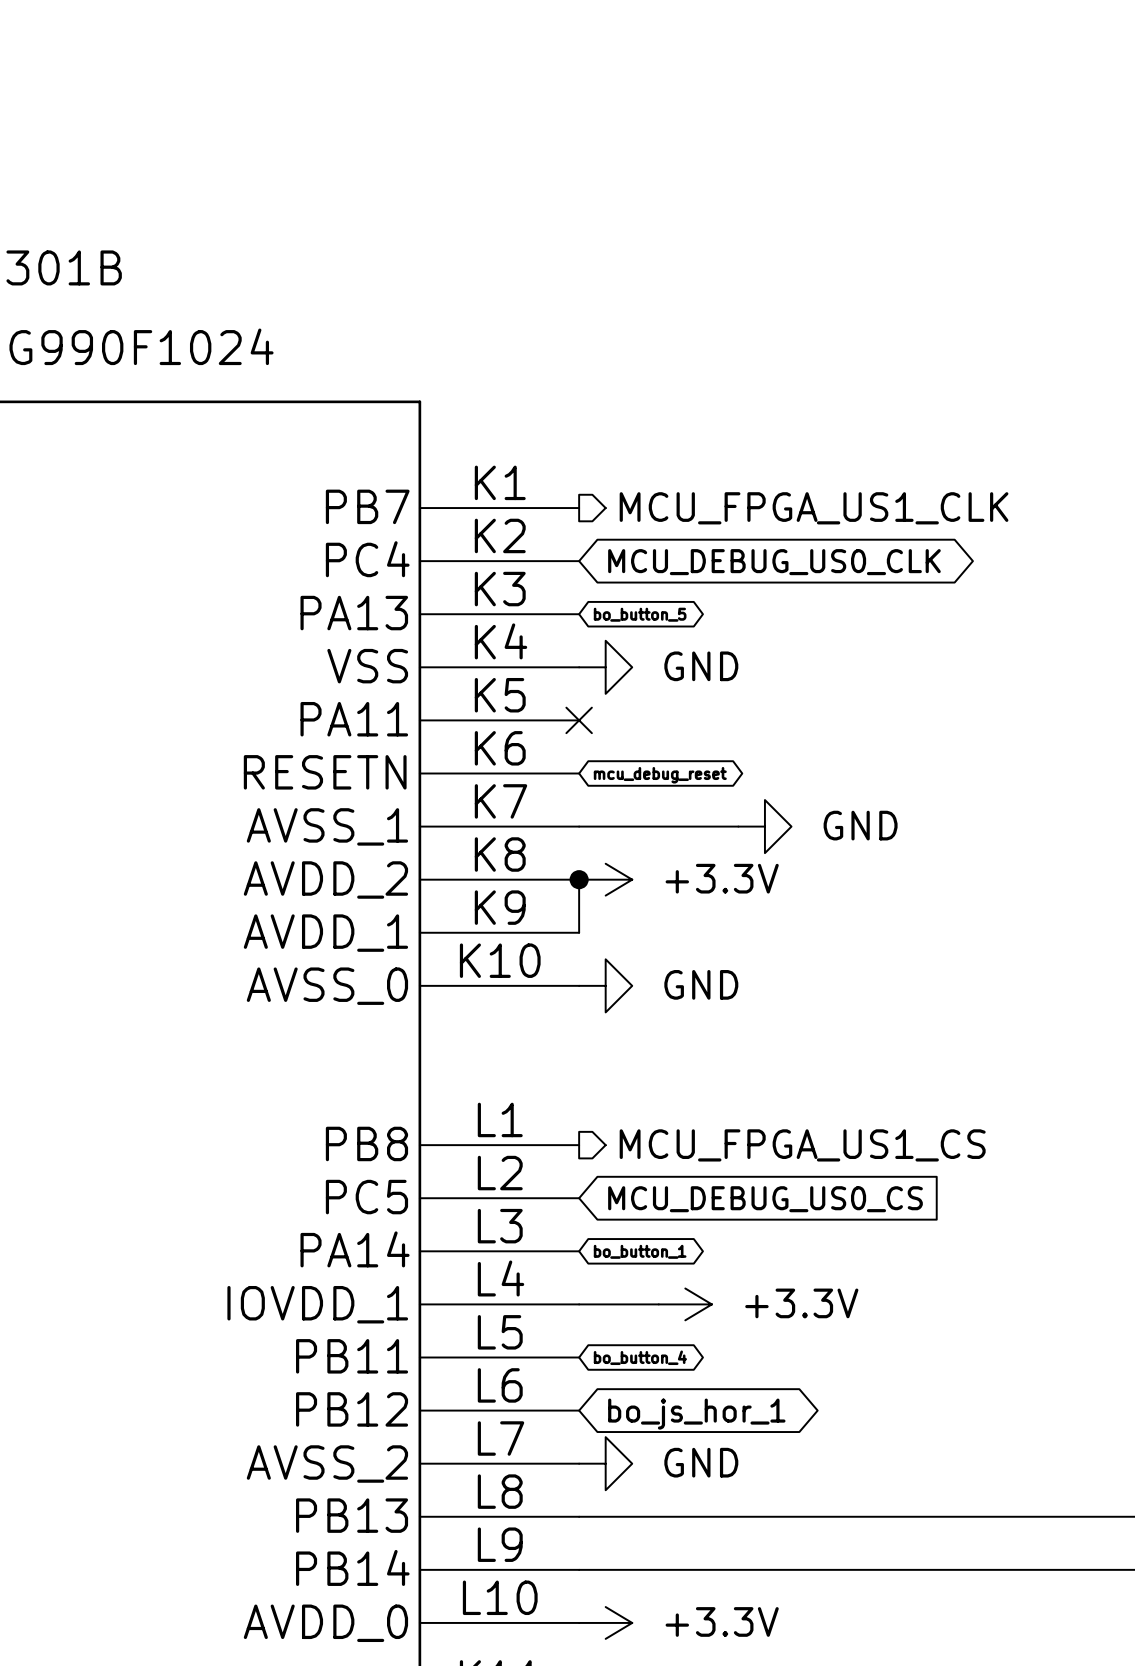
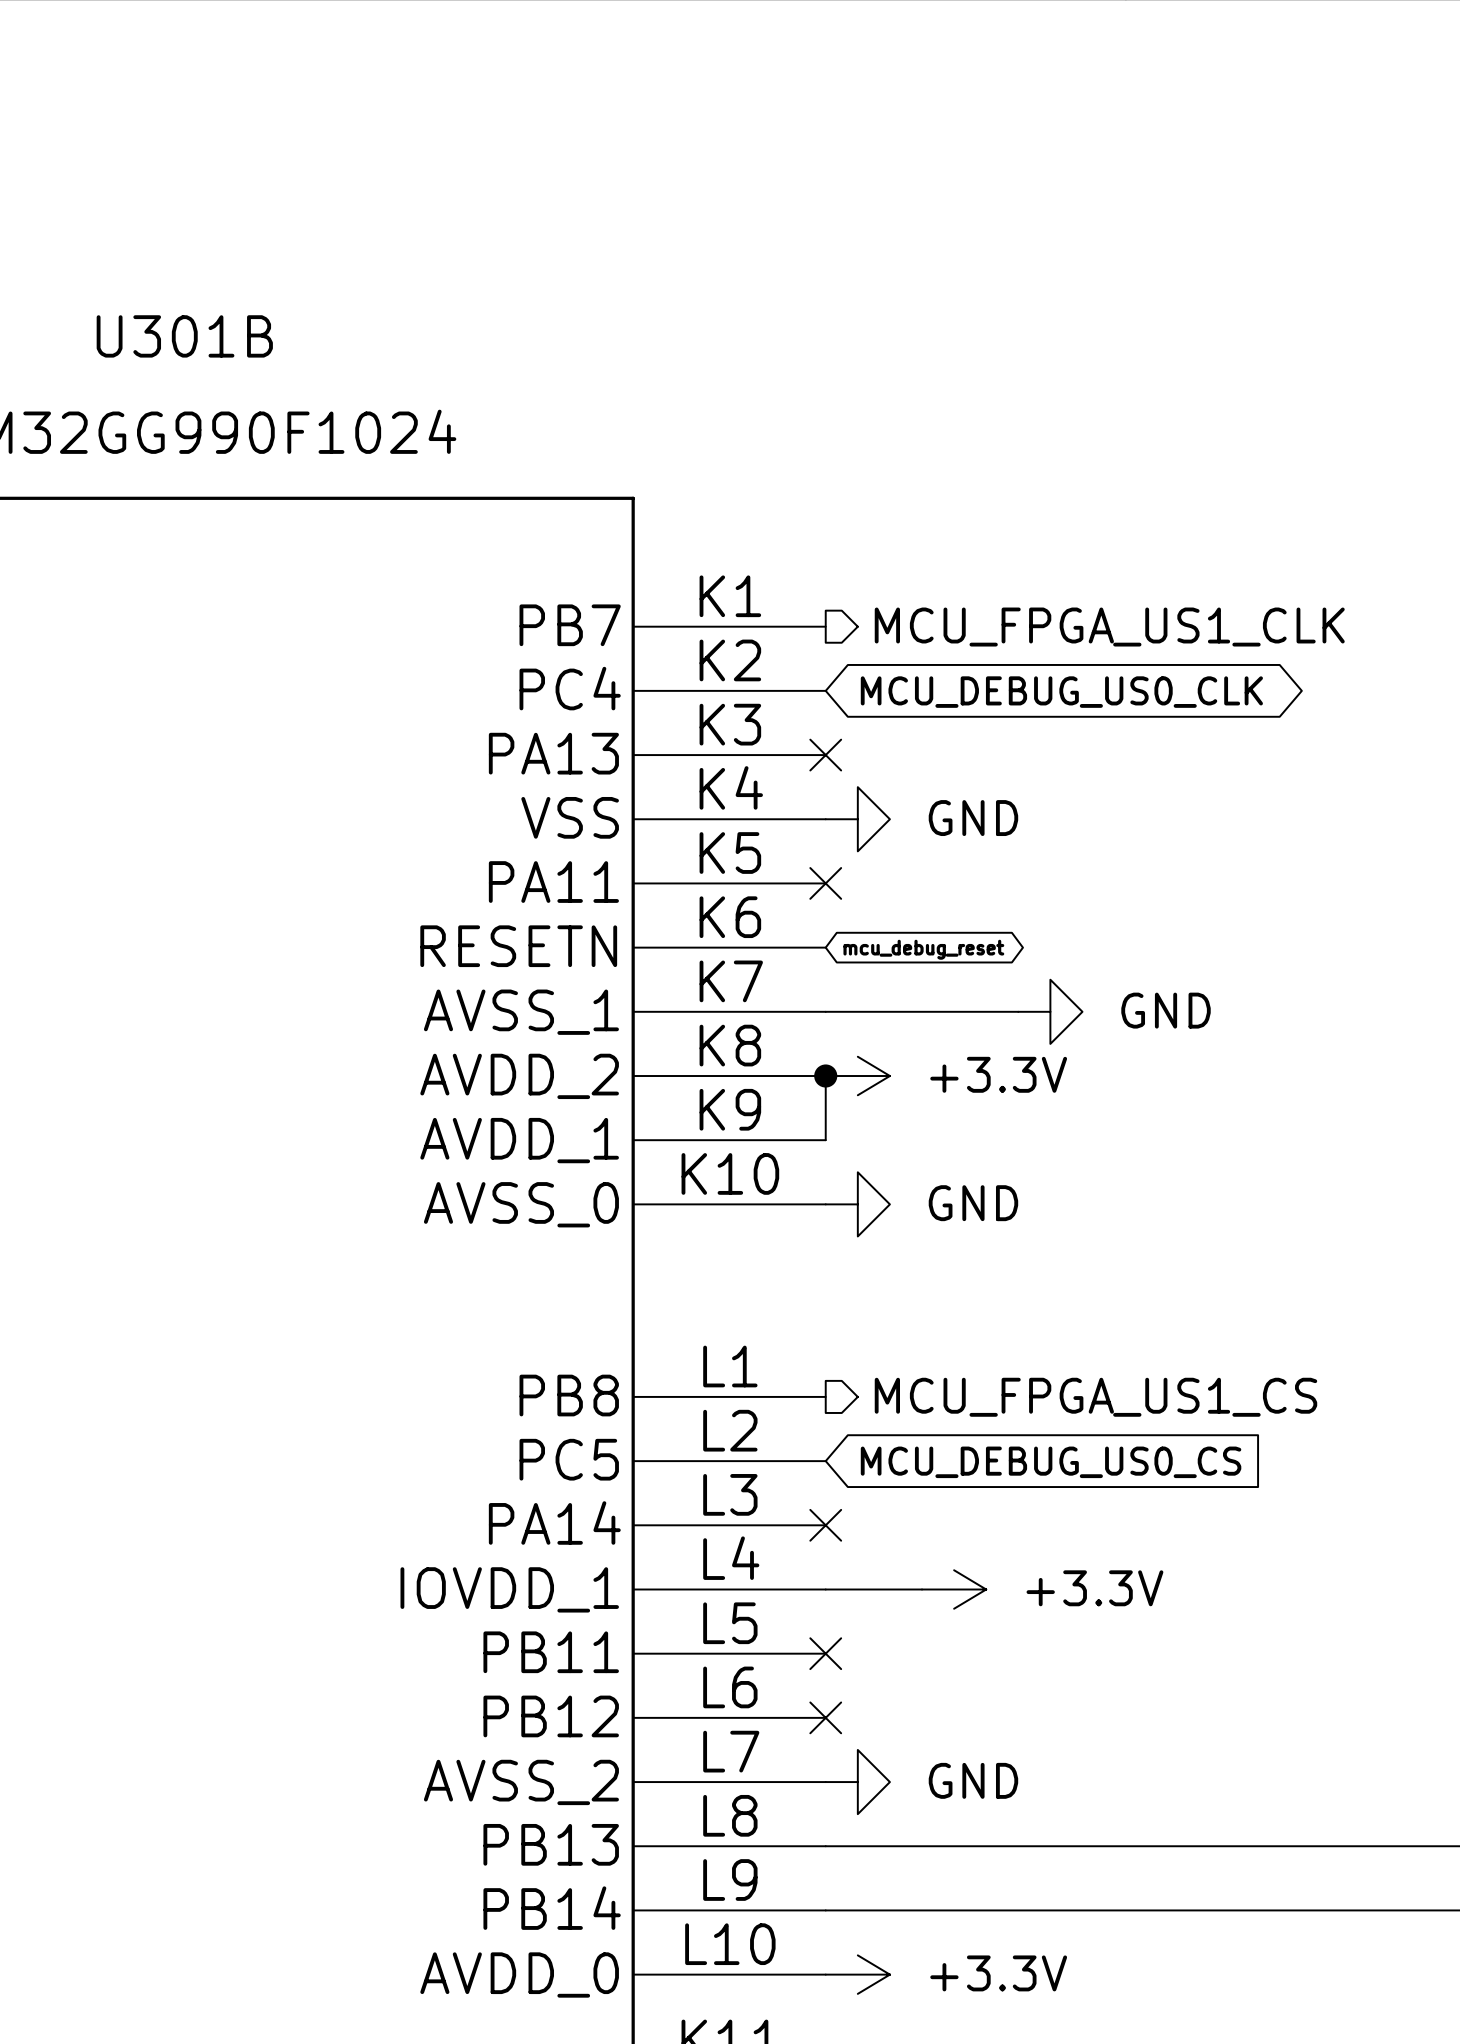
no-connect mark: none -> (825, 755)
global label: bo_button_5 (640, 614) -> none
no-connect mark: none -> (825, 1525)
global label: bo_button_1 (640, 1251) -> none
no-connect mark: none -> (825, 1653)
global label: bo_button_4 (640, 1357) -> none
no-connect mark: none -> (825, 1717)
global label: bo_js_hor_1 (696, 1414) -> none

